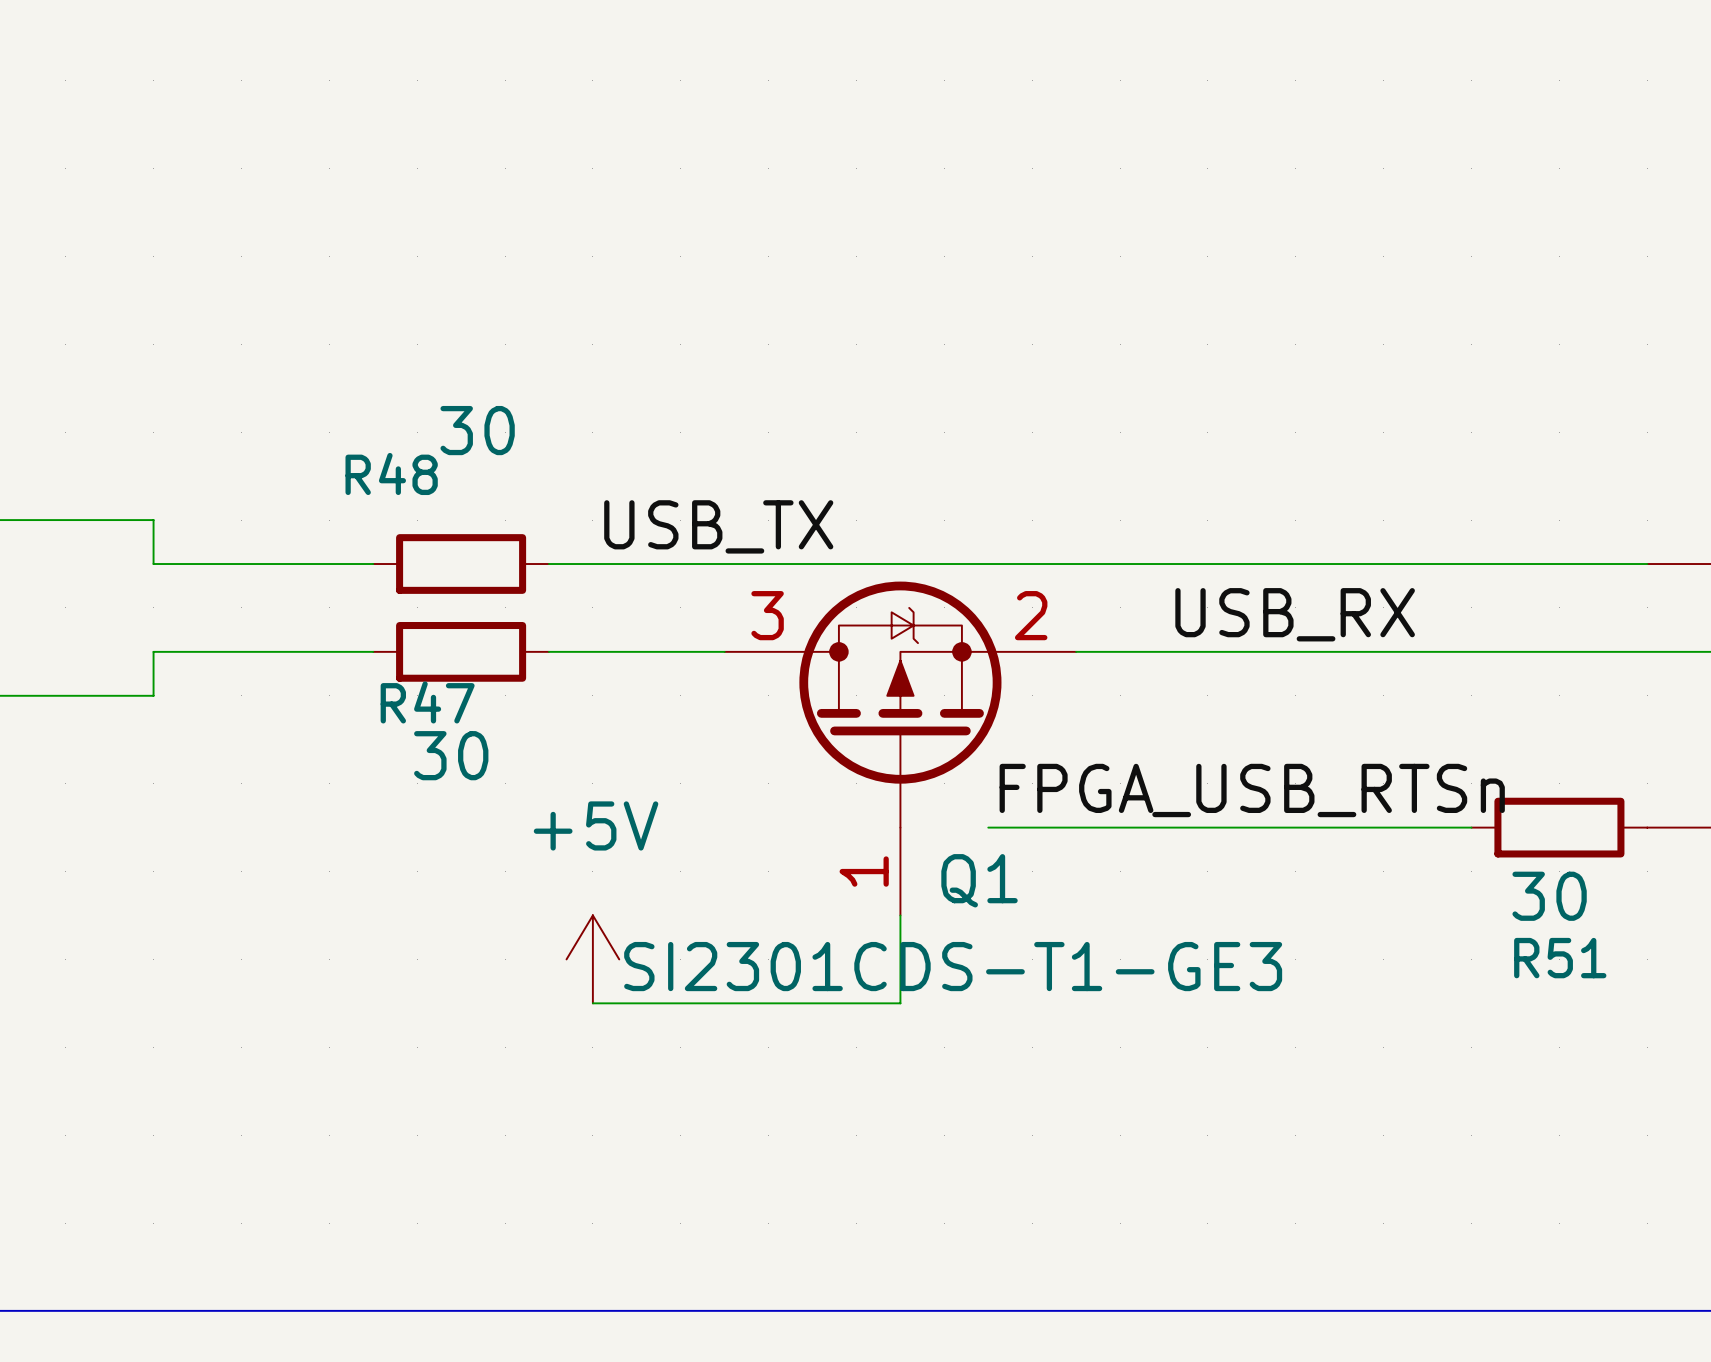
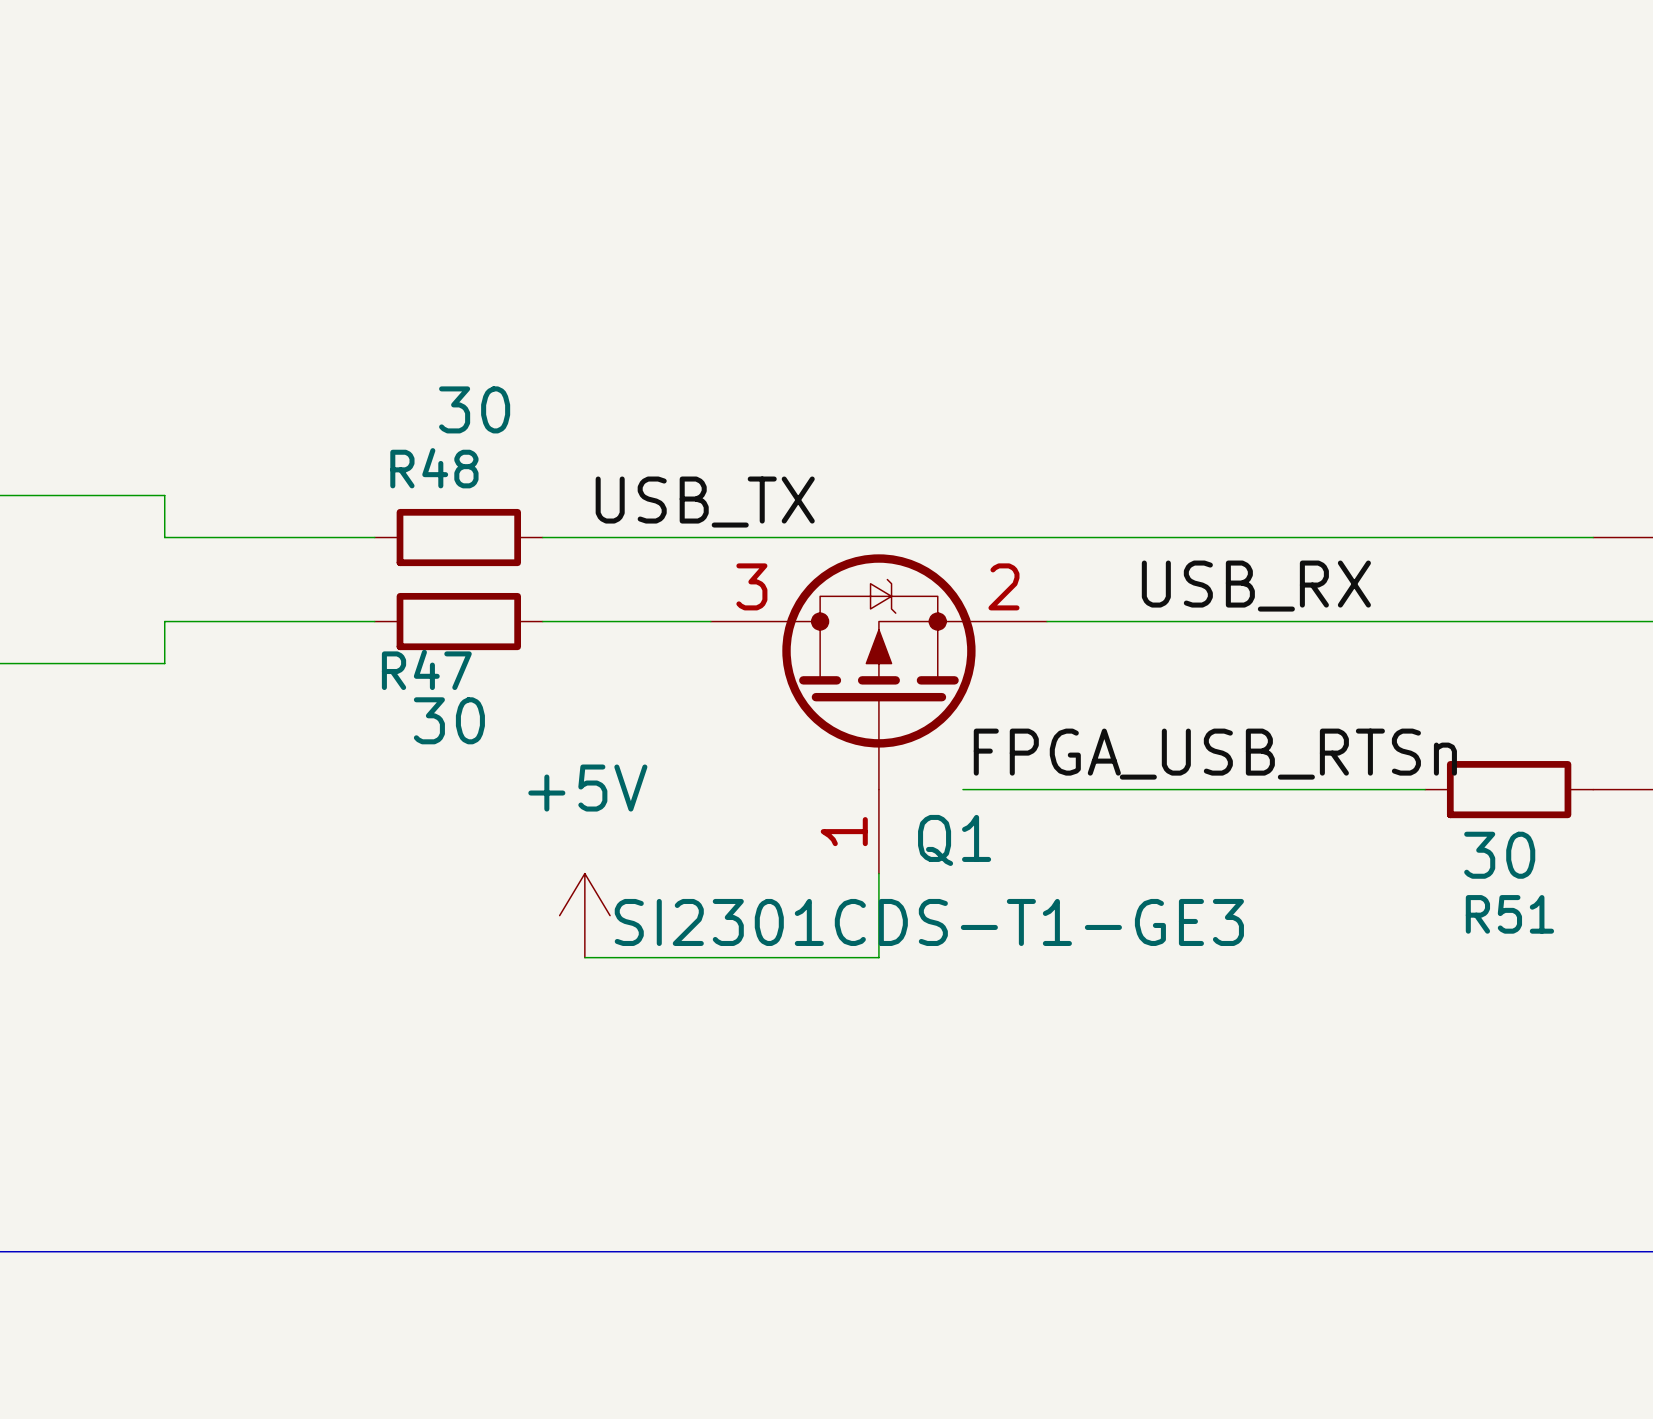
R48 name position: R48 (391, 473) -> R48 (434, 468)

